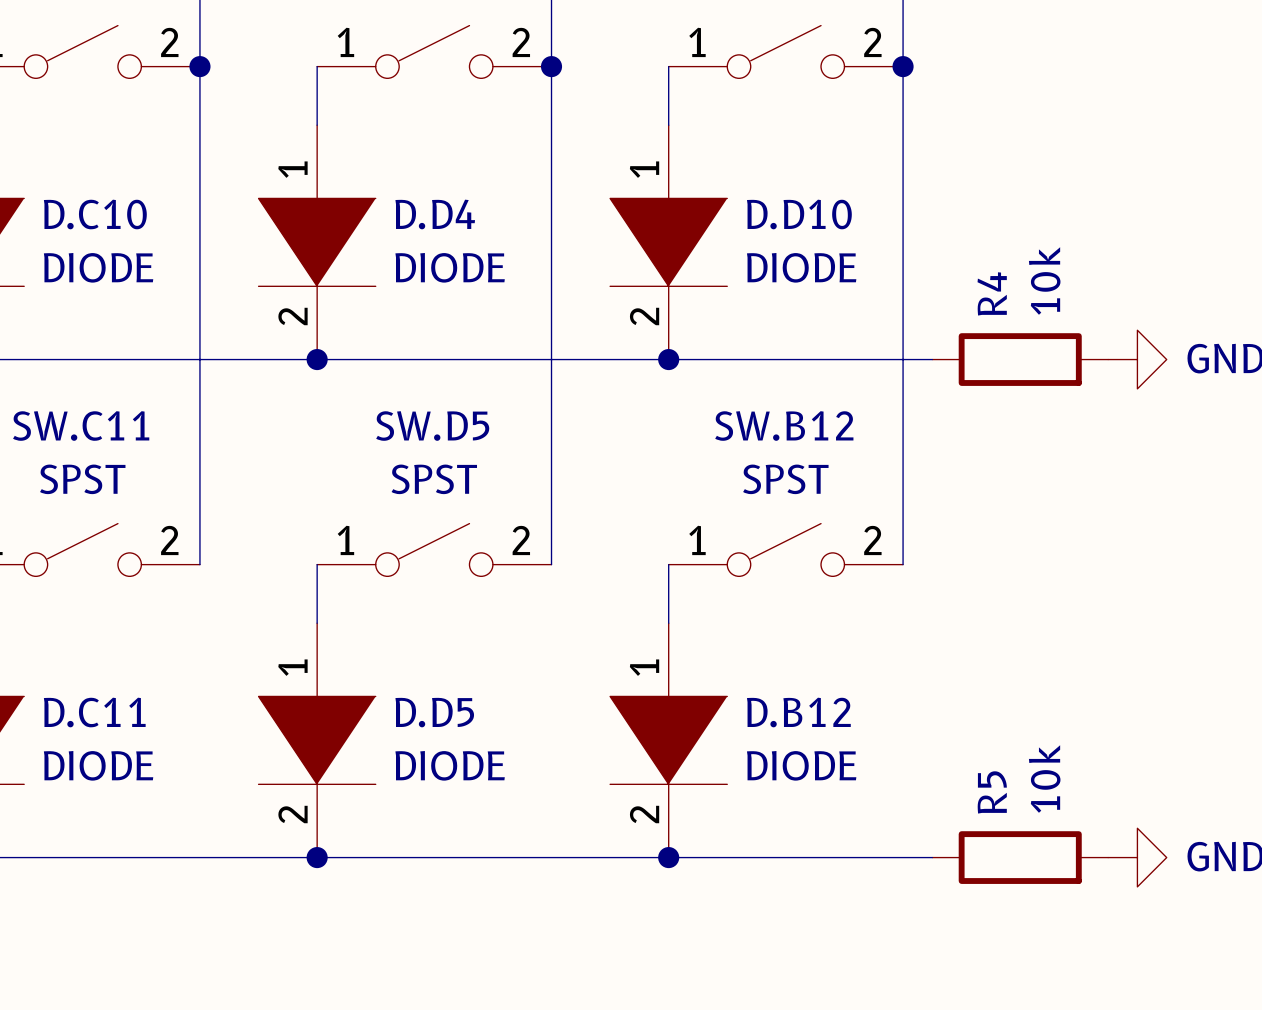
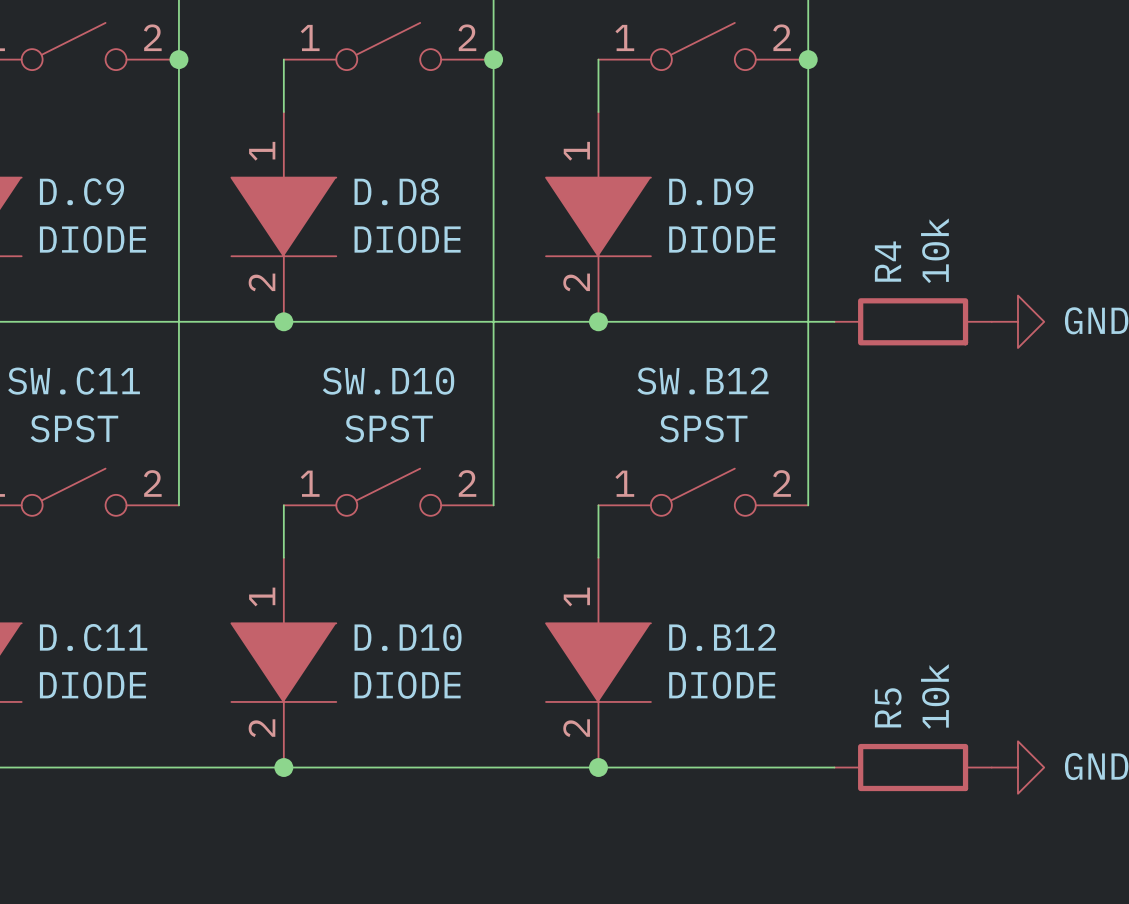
D.C10 name: D.C10 (95, 214) -> D.C9 (81, 191)
D.D4 name: D.D4 (435, 214) -> D.D8 (396, 191)
D.D10 name: D.D10 (799, 214) -> D.D9 (711, 191)
SW.D5 name: SW.D5 (432, 426) -> SW.D10 (388, 381)
D.D5 name: D.D5 (434, 712) -> D.D10 (408, 637)

